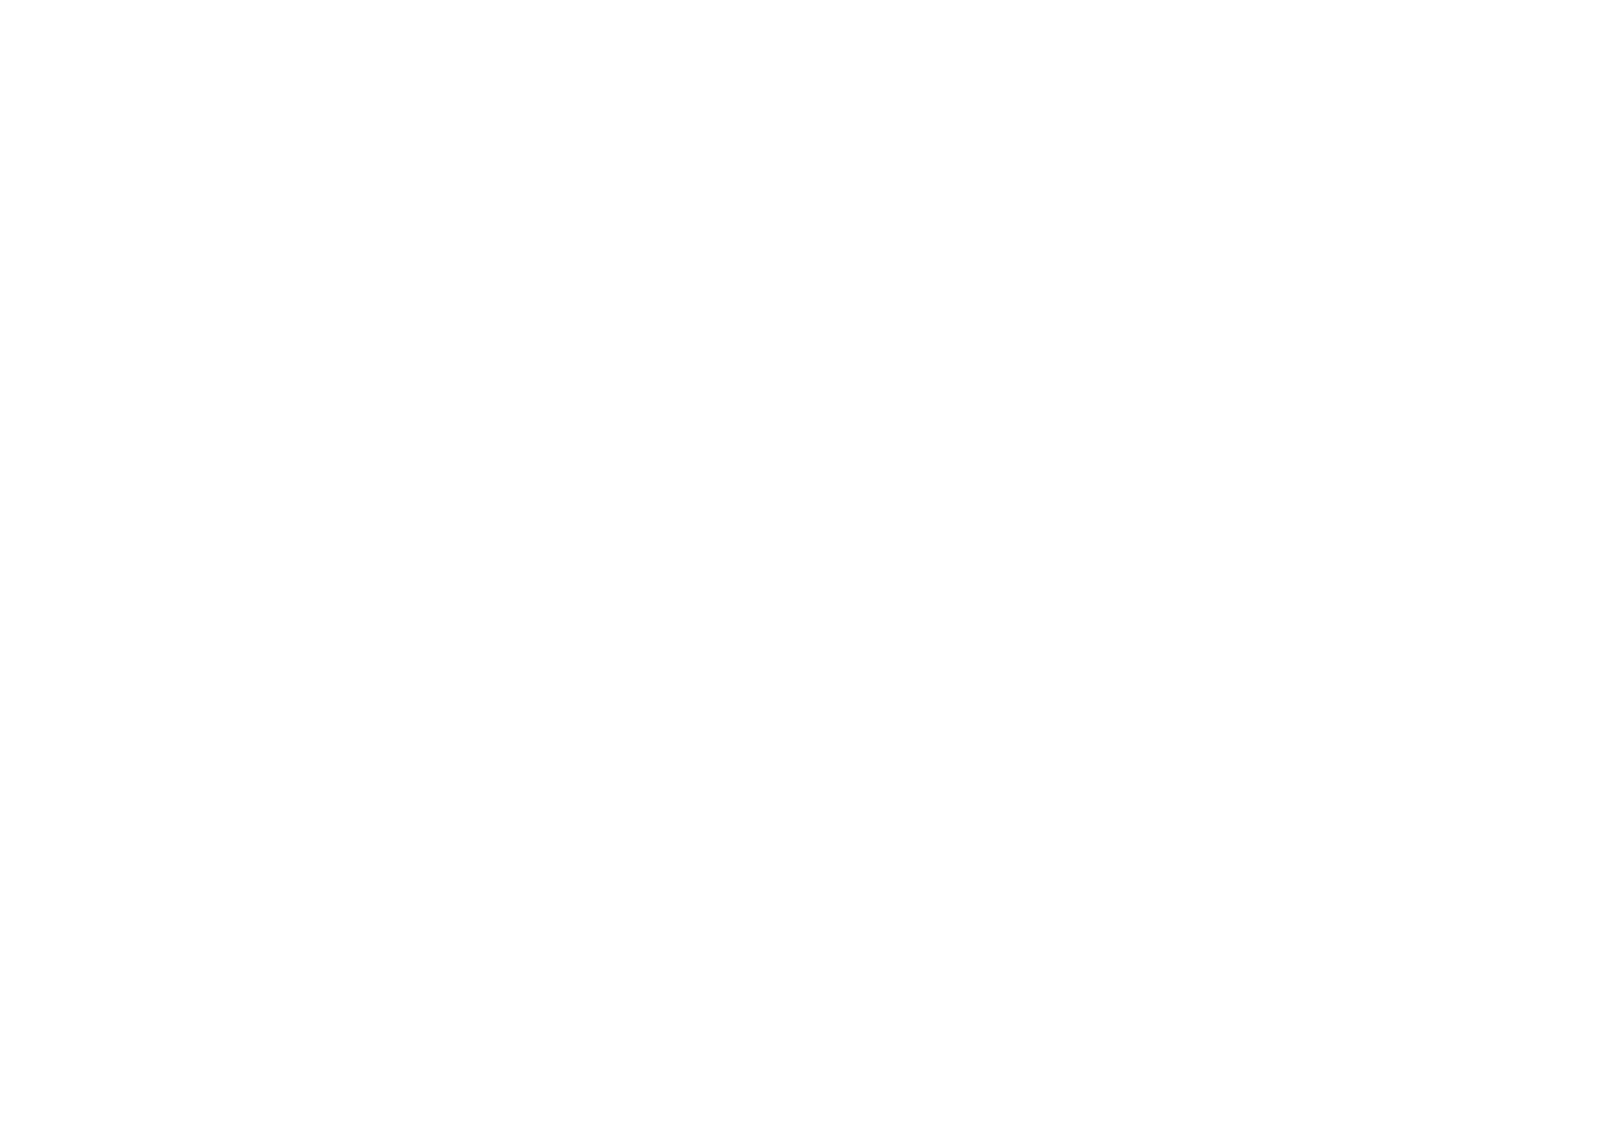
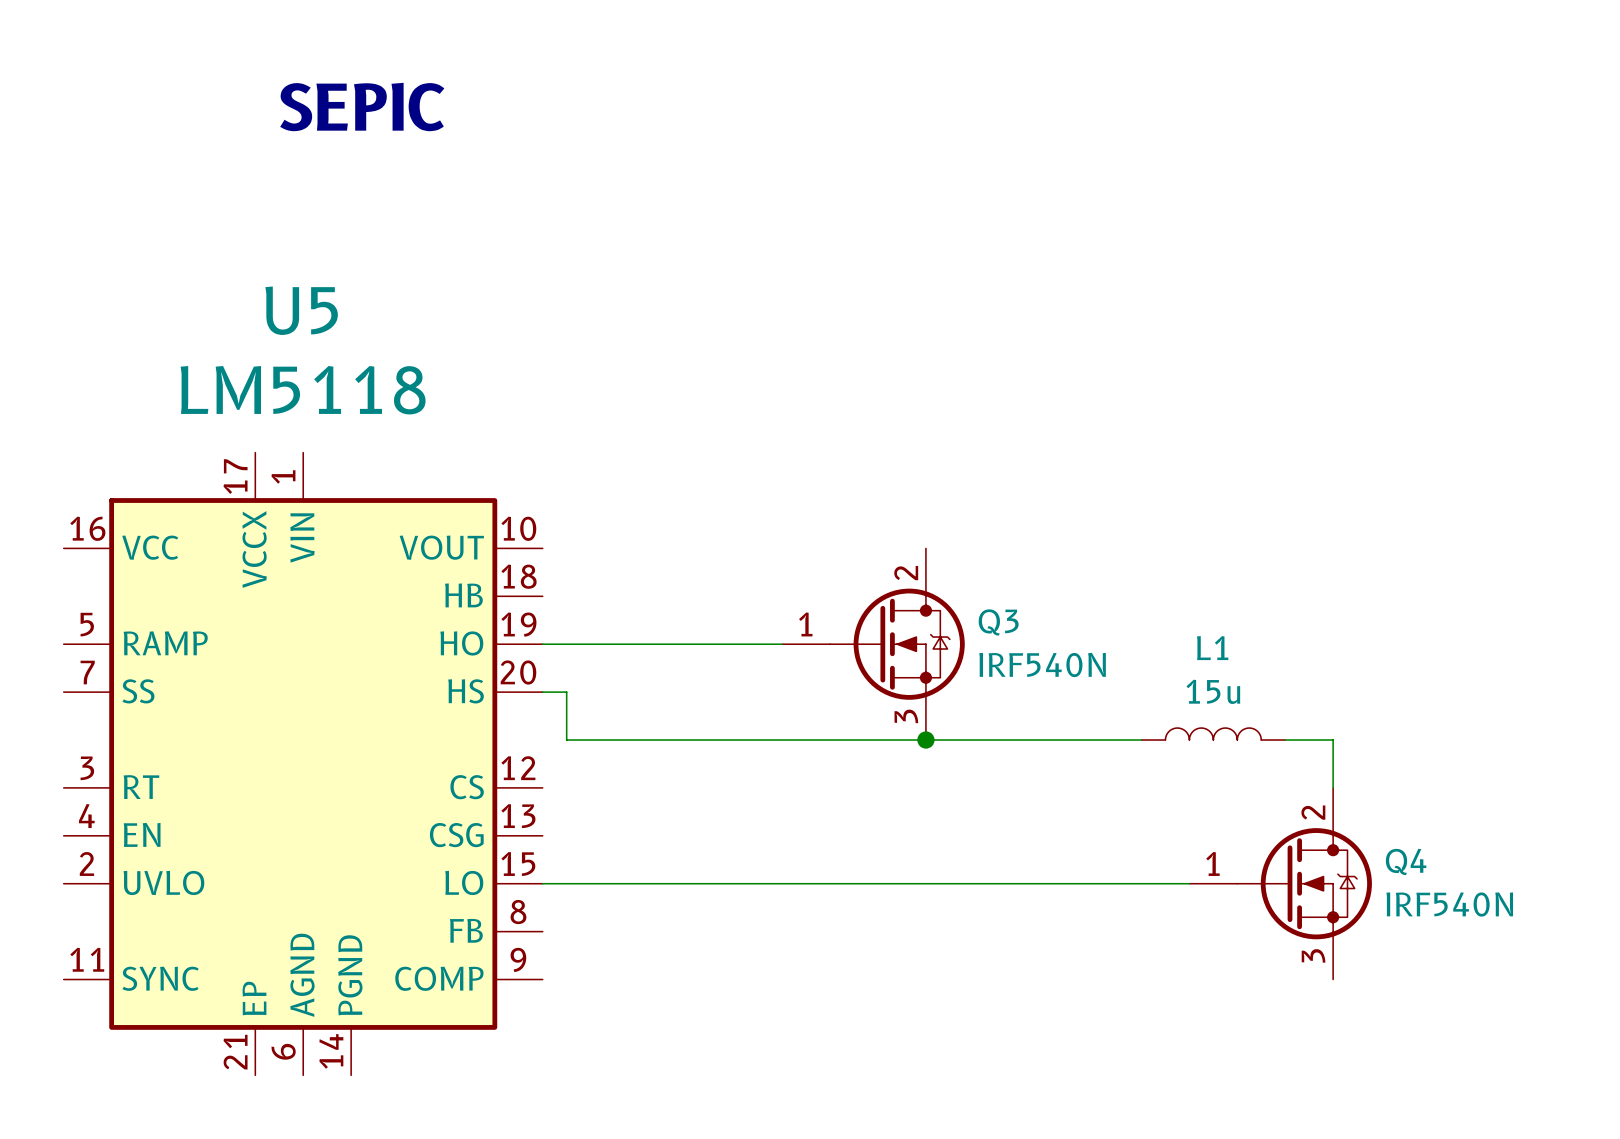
text: none -> SEPIC (362, 107)
wire: none -> (542, 644) (782, 644)
Q3: none -> IRF540N (873, 644)
wire: none -> (542, 692) (566, 692) (566, 740) (1141, 740)
L1: none -> 15u (1213, 734)
junction: none -> (925, 740)
wire: none -> (1285, 740) (1333, 740) (1333, 787)
U5: none -> LM5118 (303, 763)
wire: none -> (542, 883) (1189, 883)
Q4: none -> IRF540N (1280, 883)

